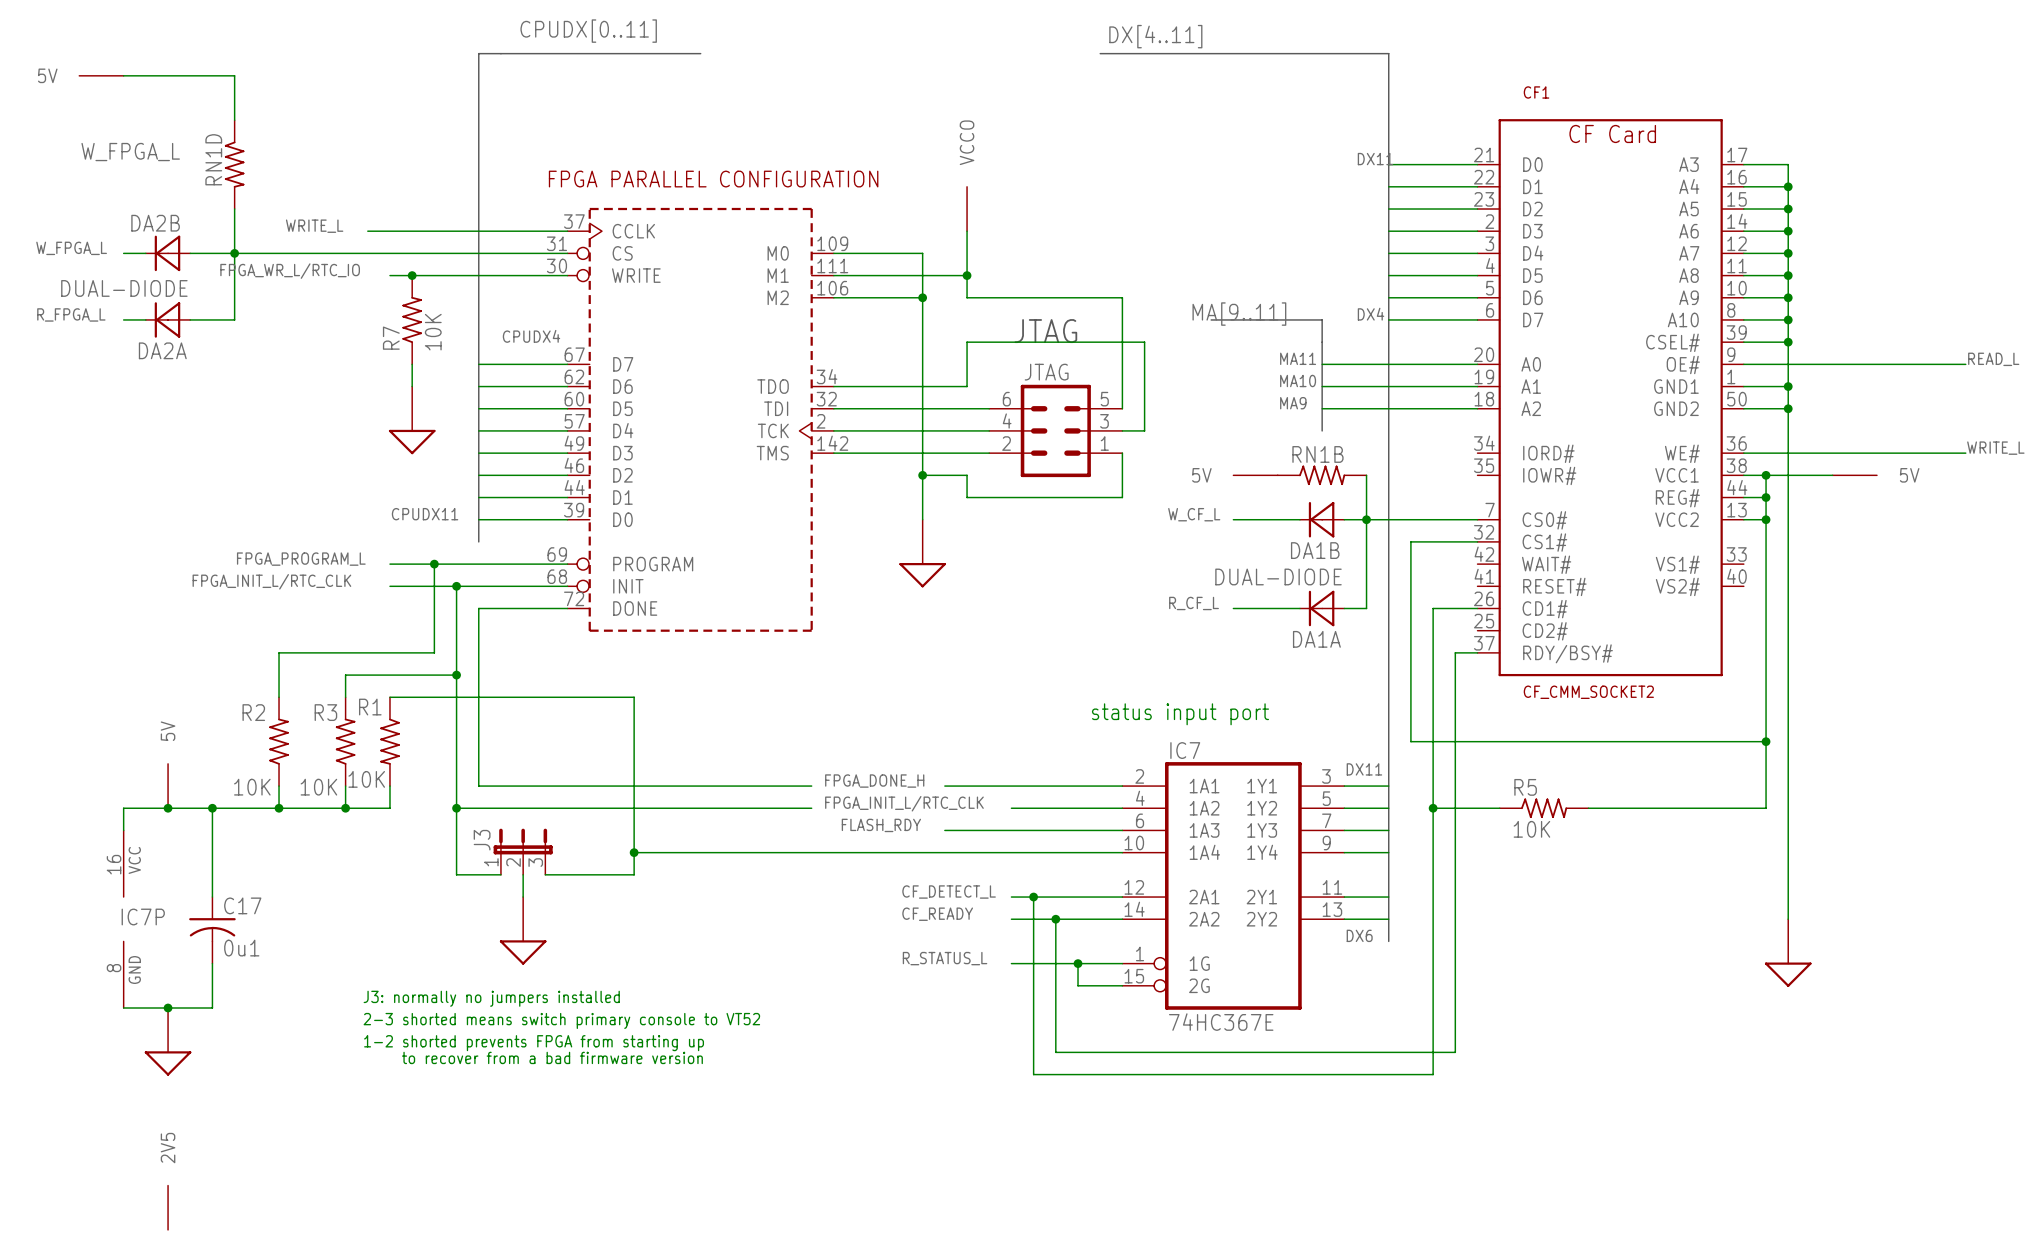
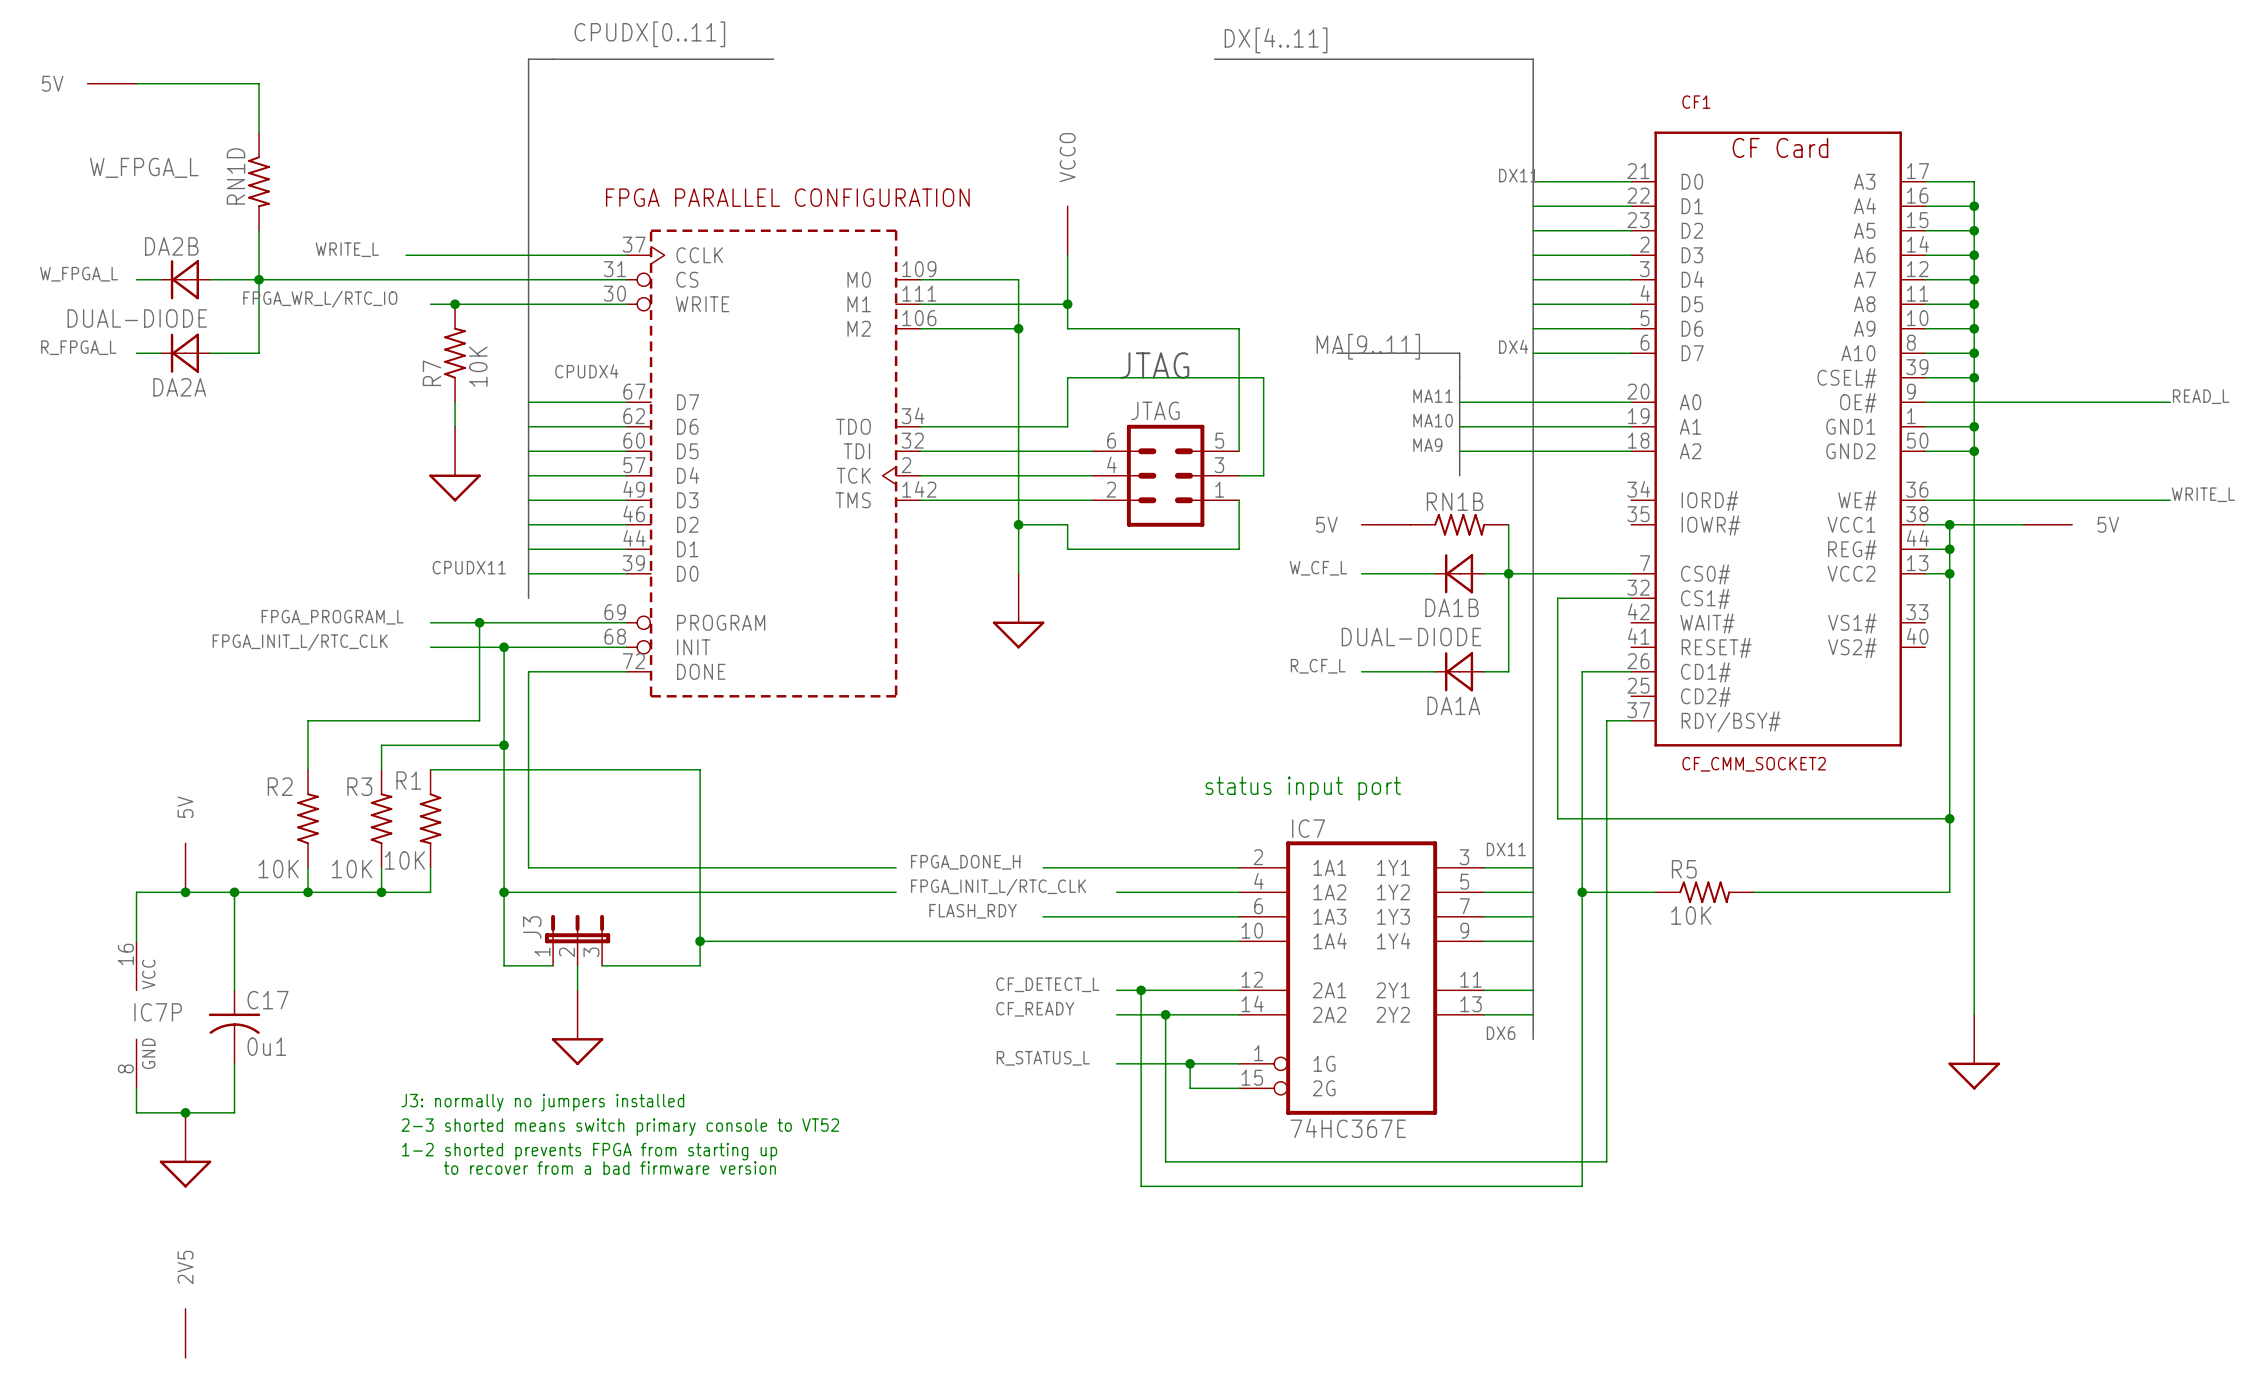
IC7P symbol: [123, 830, 124, 1009] -> [136, 941, 137, 1089]

